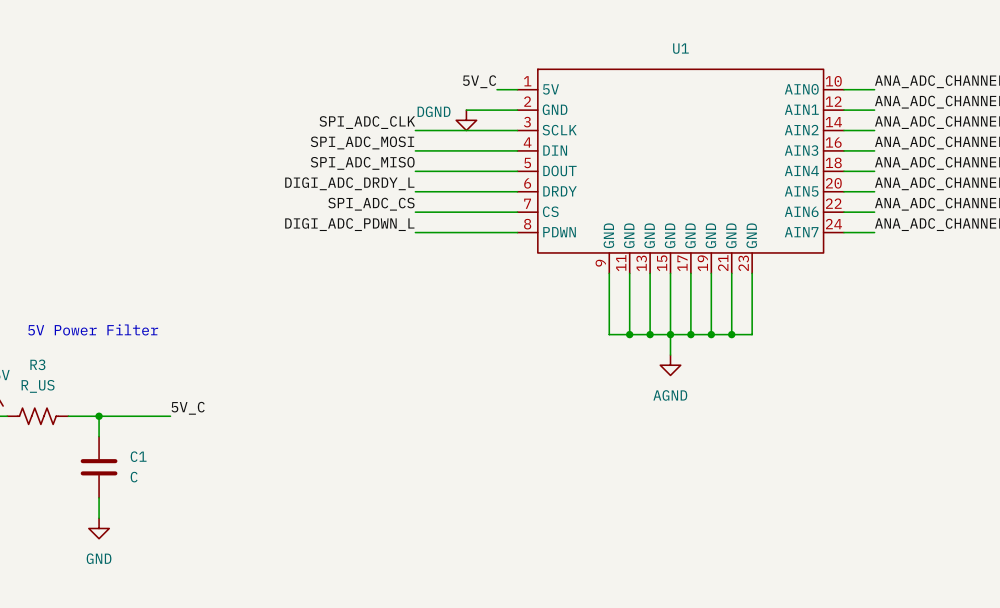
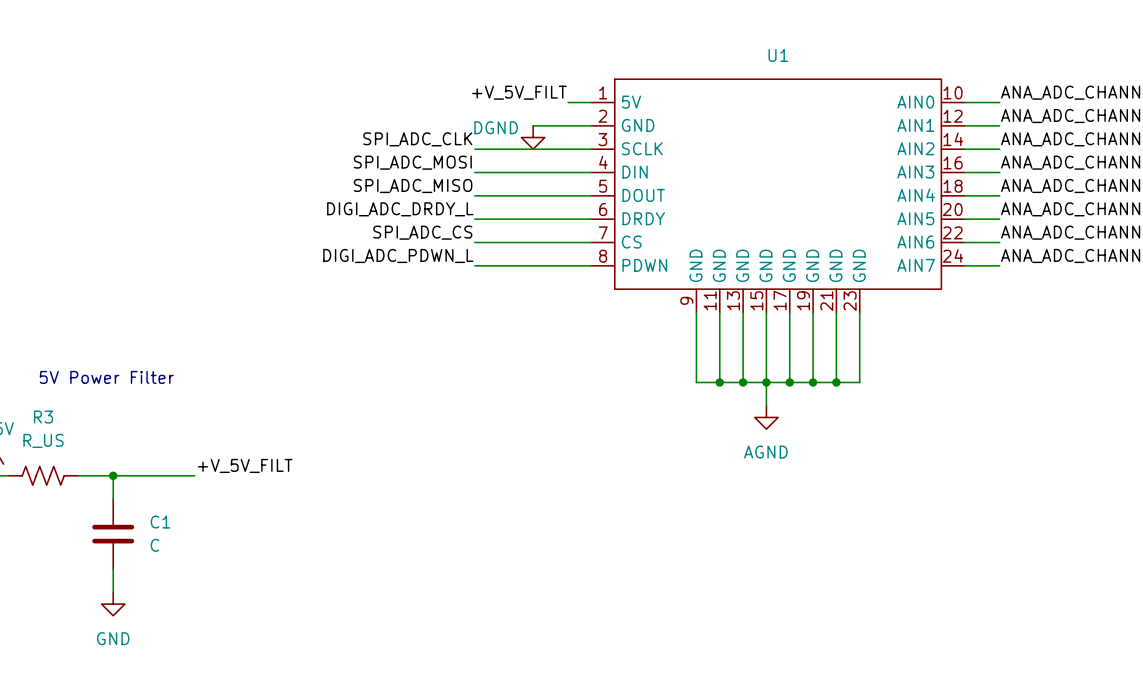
label: 5V_C (479, 81) -> +V_5V_FILT (519, 92)
label: 5V_C (188, 408) -> +V_5V_FILT (245, 465)

